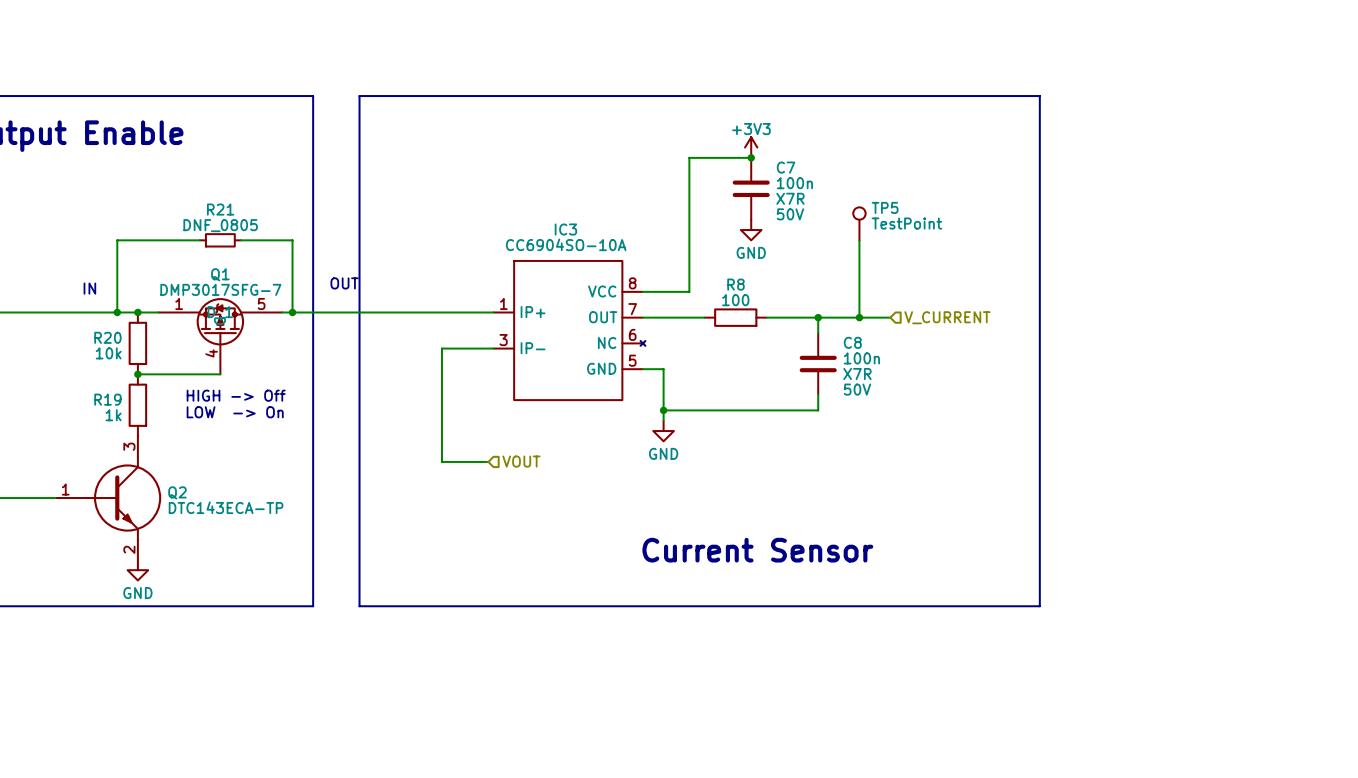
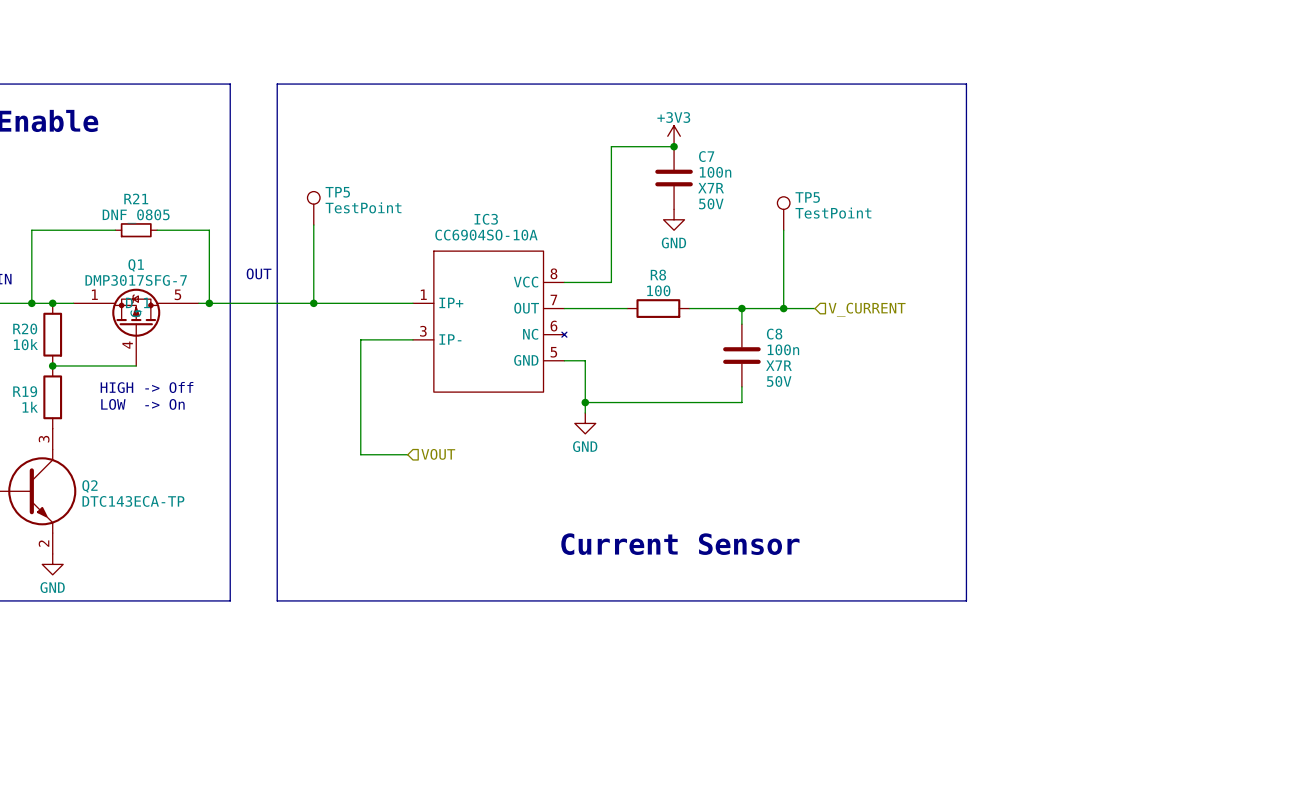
TP5: none -> TestPoint (313, 208)
wire: none -> (313, 225) (313, 303)
junction: none -> (313, 303)

